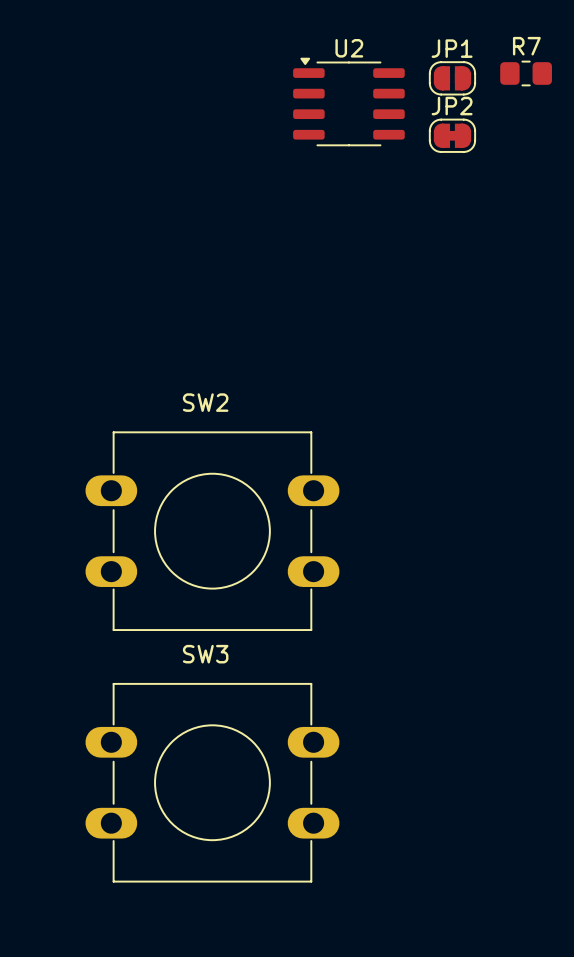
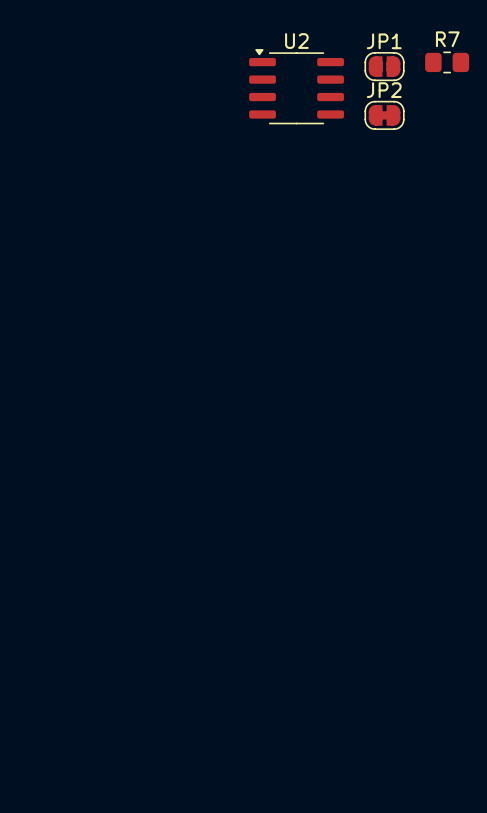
SW2: (212, 531) -> none
SW3: (212, 782) -> none

